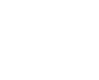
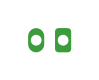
part: none -> (49, 40)

